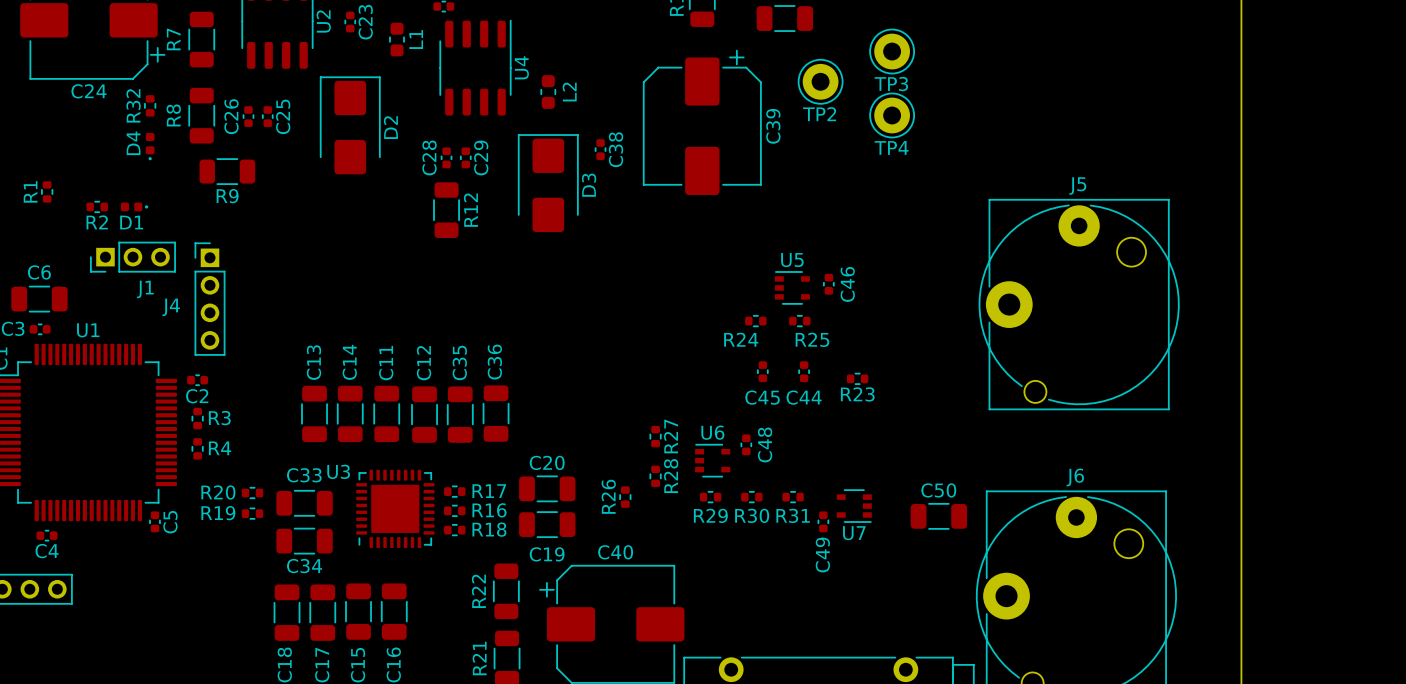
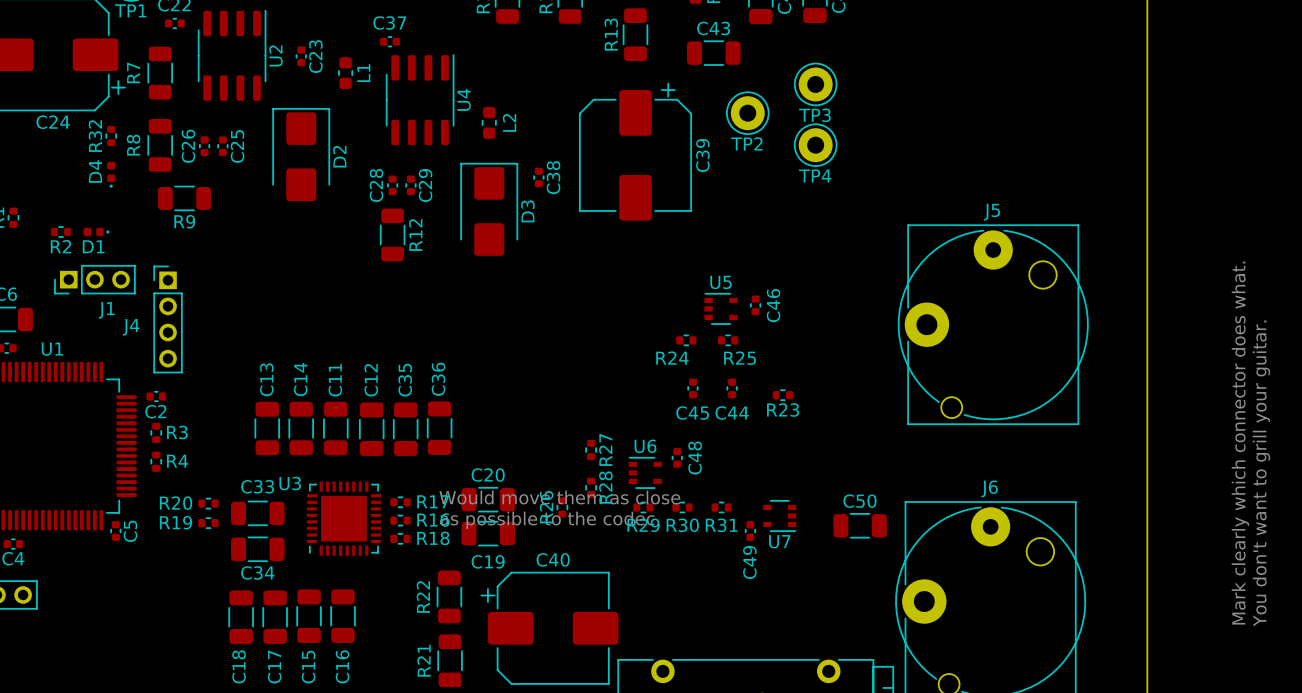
text: none -> Mark clearly which connector does what. (1240, 443)
text: none -> You don't want to grill your guitar. (1261, 473)
text: none -> Would move them as close (559, 497)
text: none -> as possible to the codec (547, 520)

